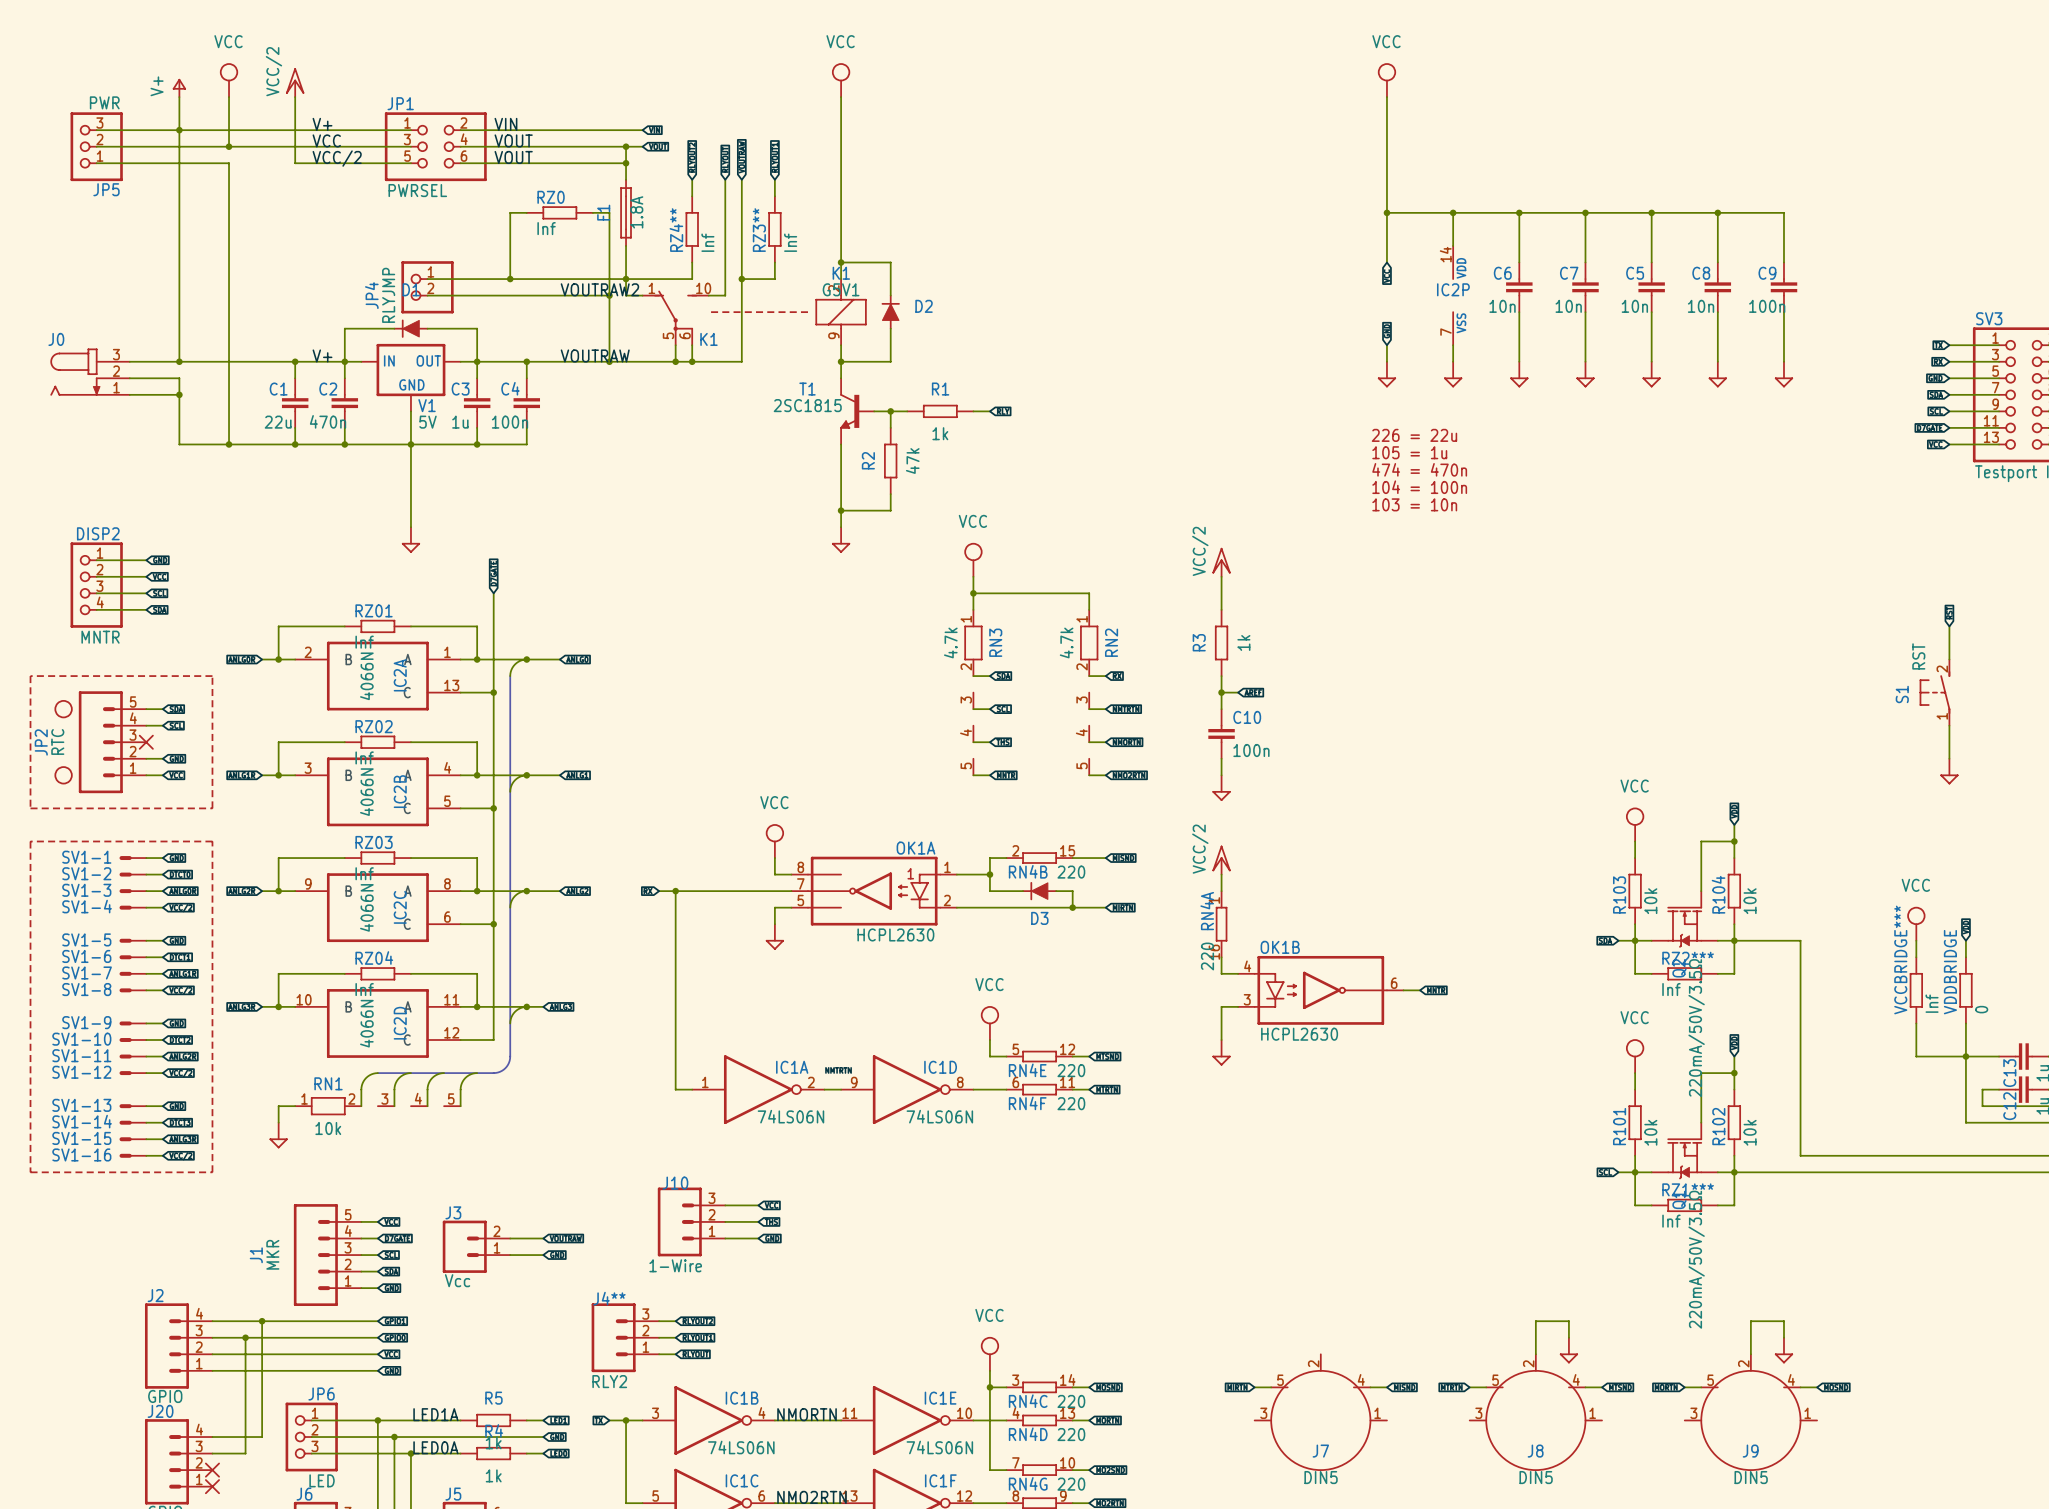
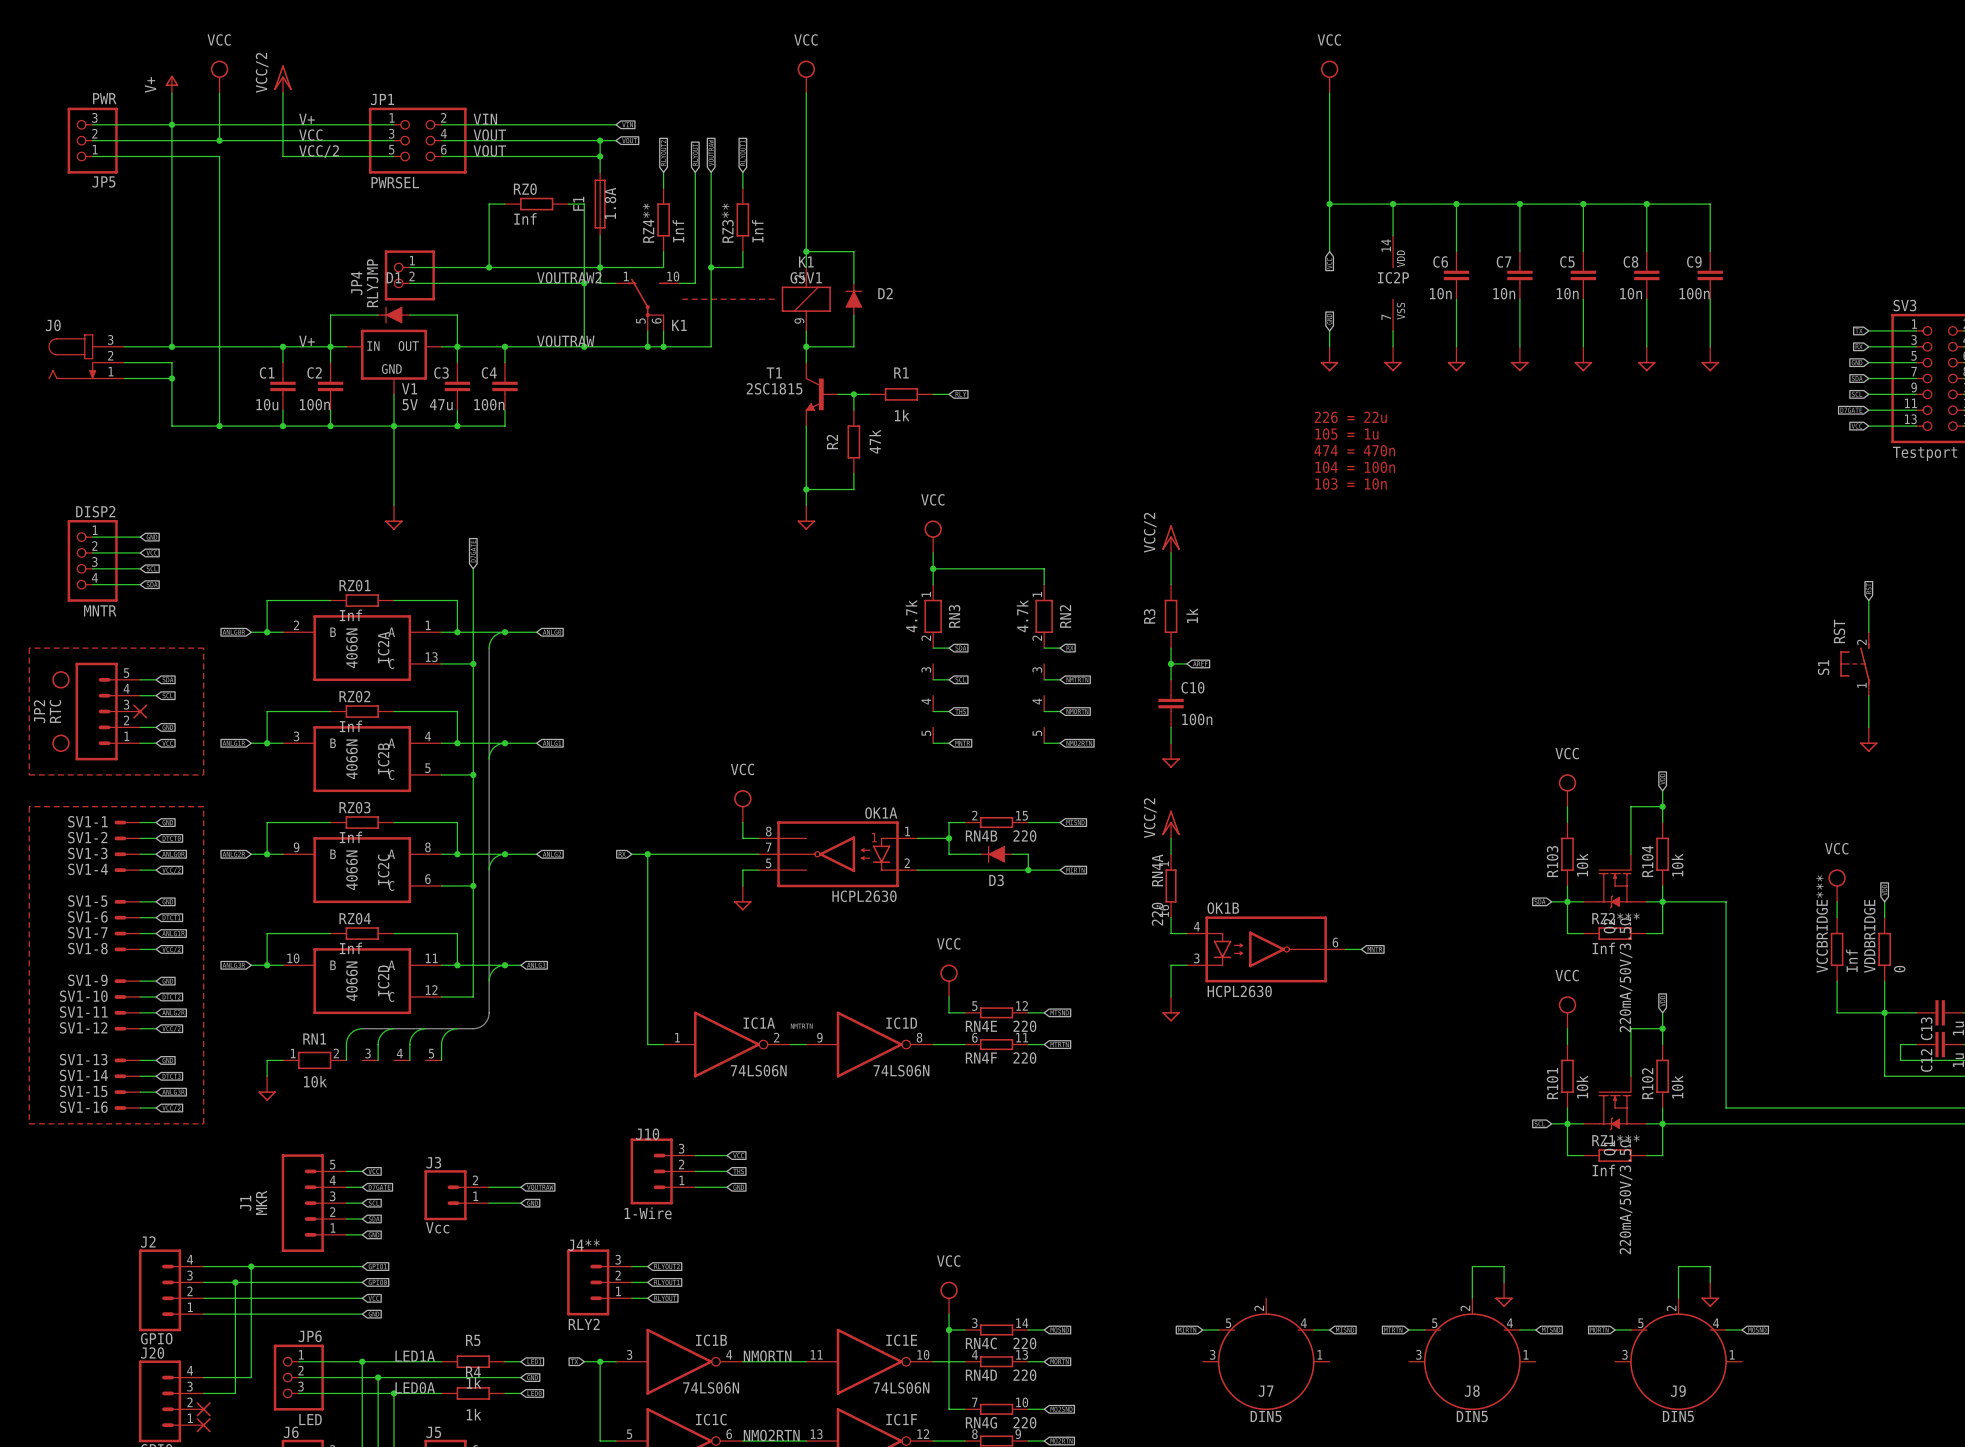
C2 value: 470n (328, 421) -> 100n (314, 404)
C1 value: 22u (278, 422) -> 10u (267, 404)
C3 value: 1u (460, 422) -> 47u (441, 404)

